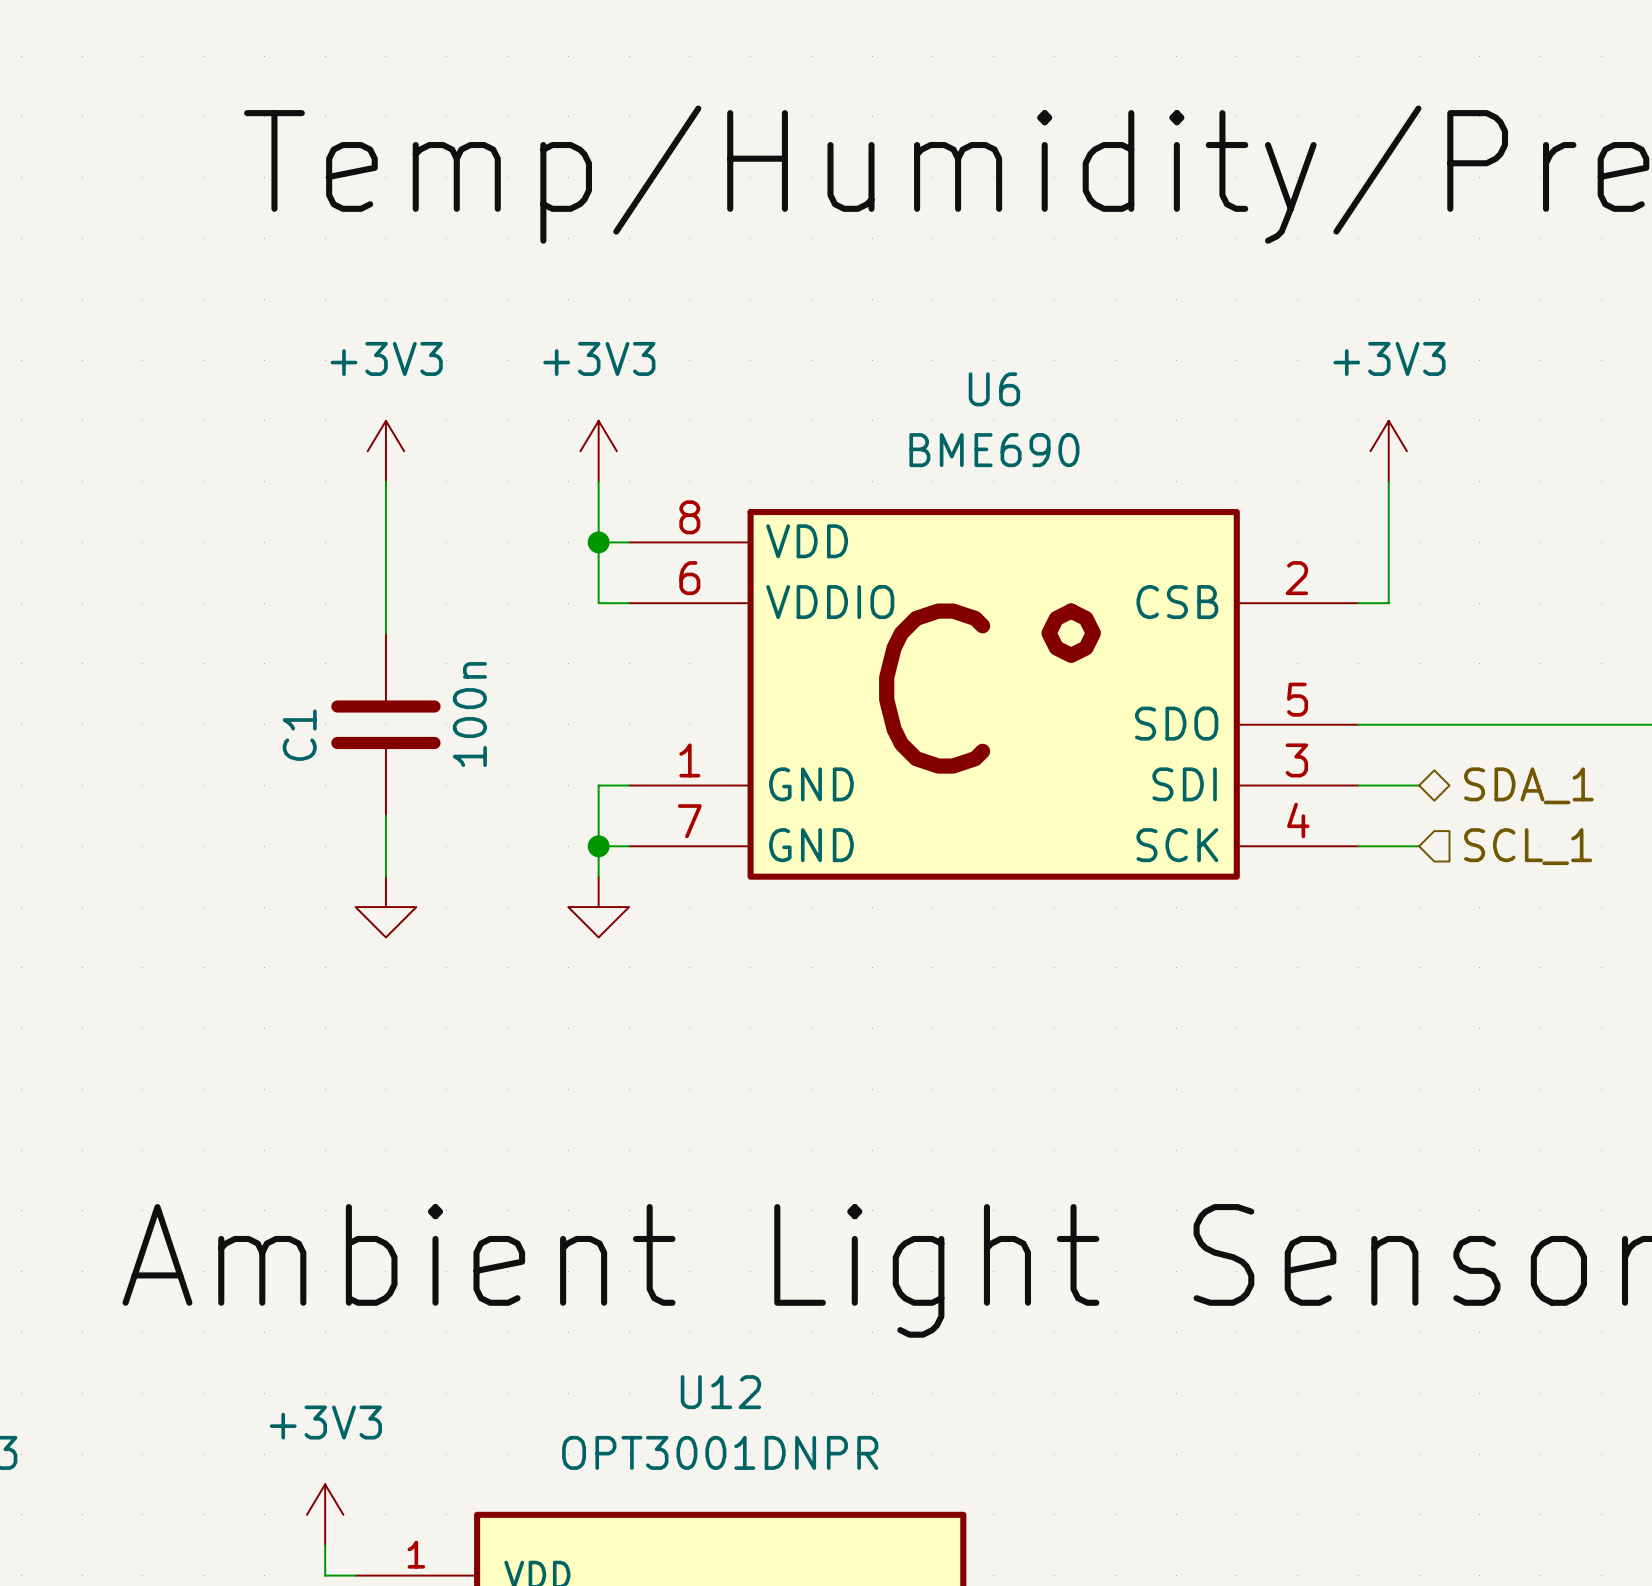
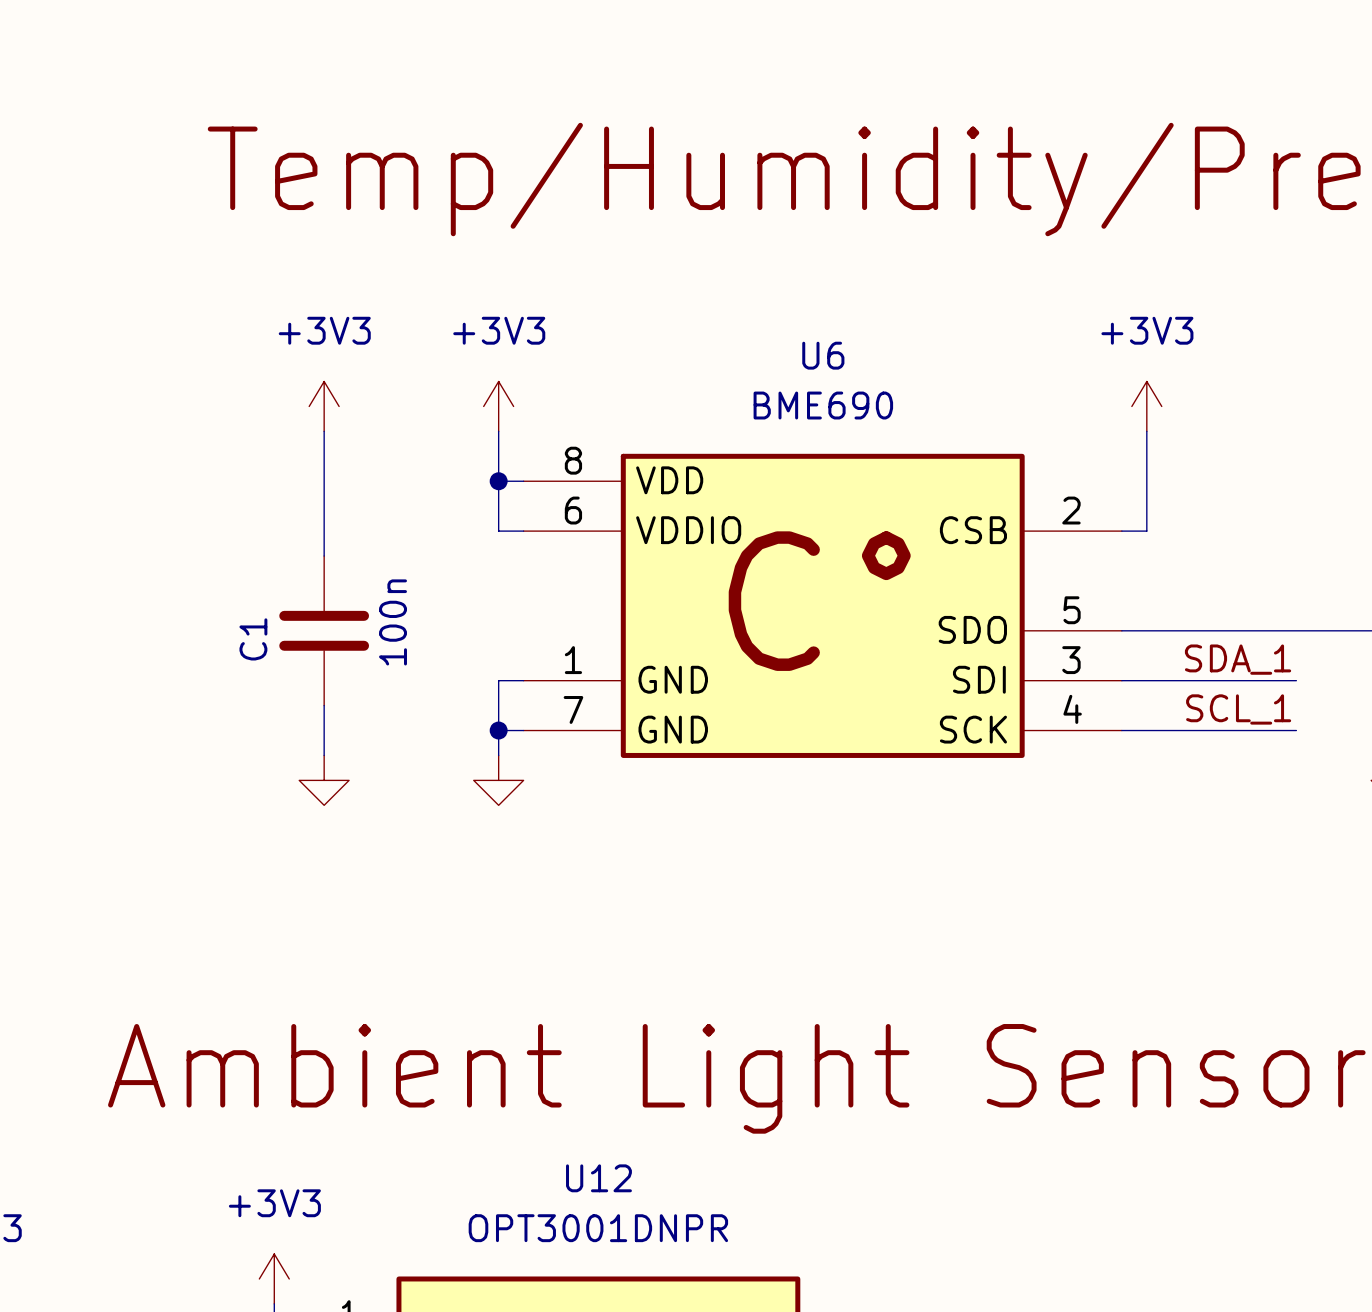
label: none -> SDA_1 (1238, 659)
wire: none -> (1171, 680) (1296, 680)
hierarchical label: SDA_1 (1528, 785) -> none
label: none -> SCL_1 (1238, 709)
wire: none -> (1171, 730) (1296, 730)
hierarchical label: SCL_1 (1528, 846) -> none

